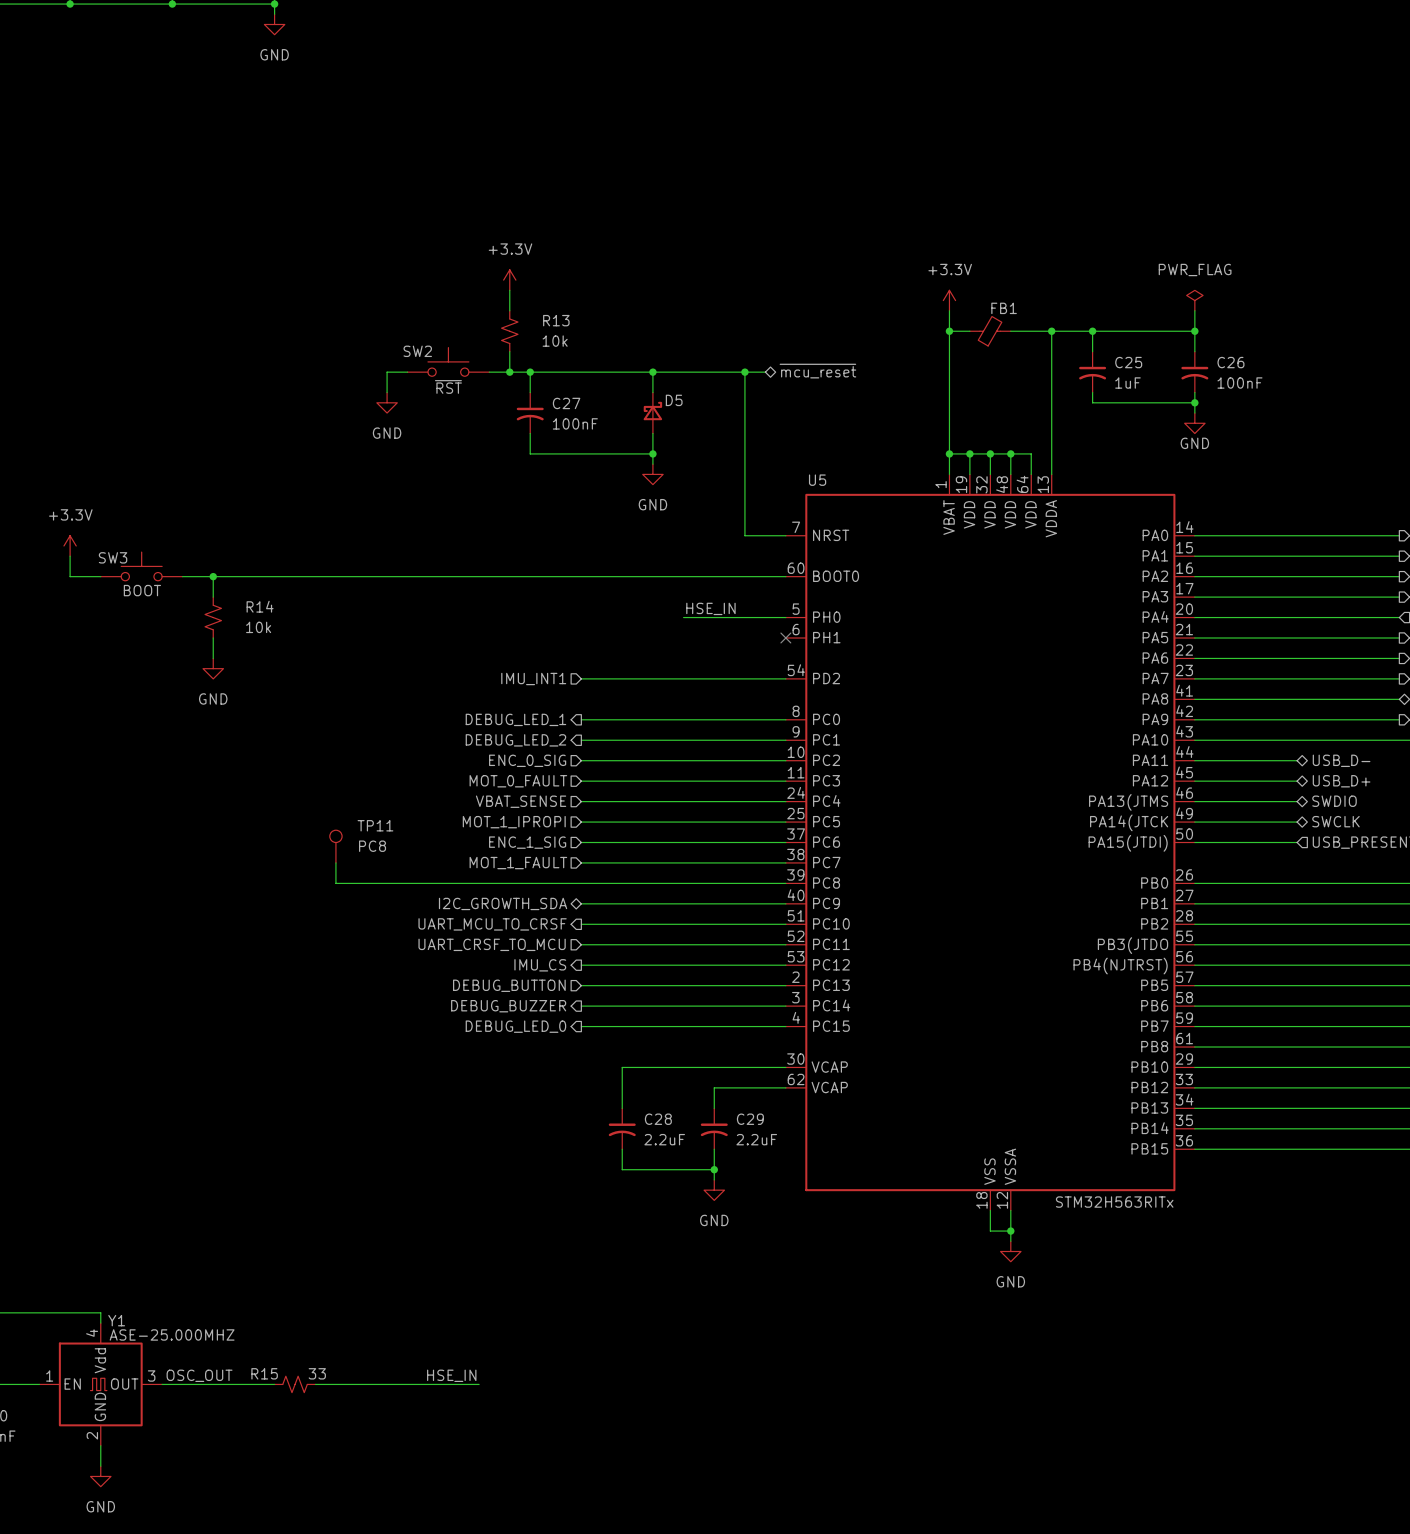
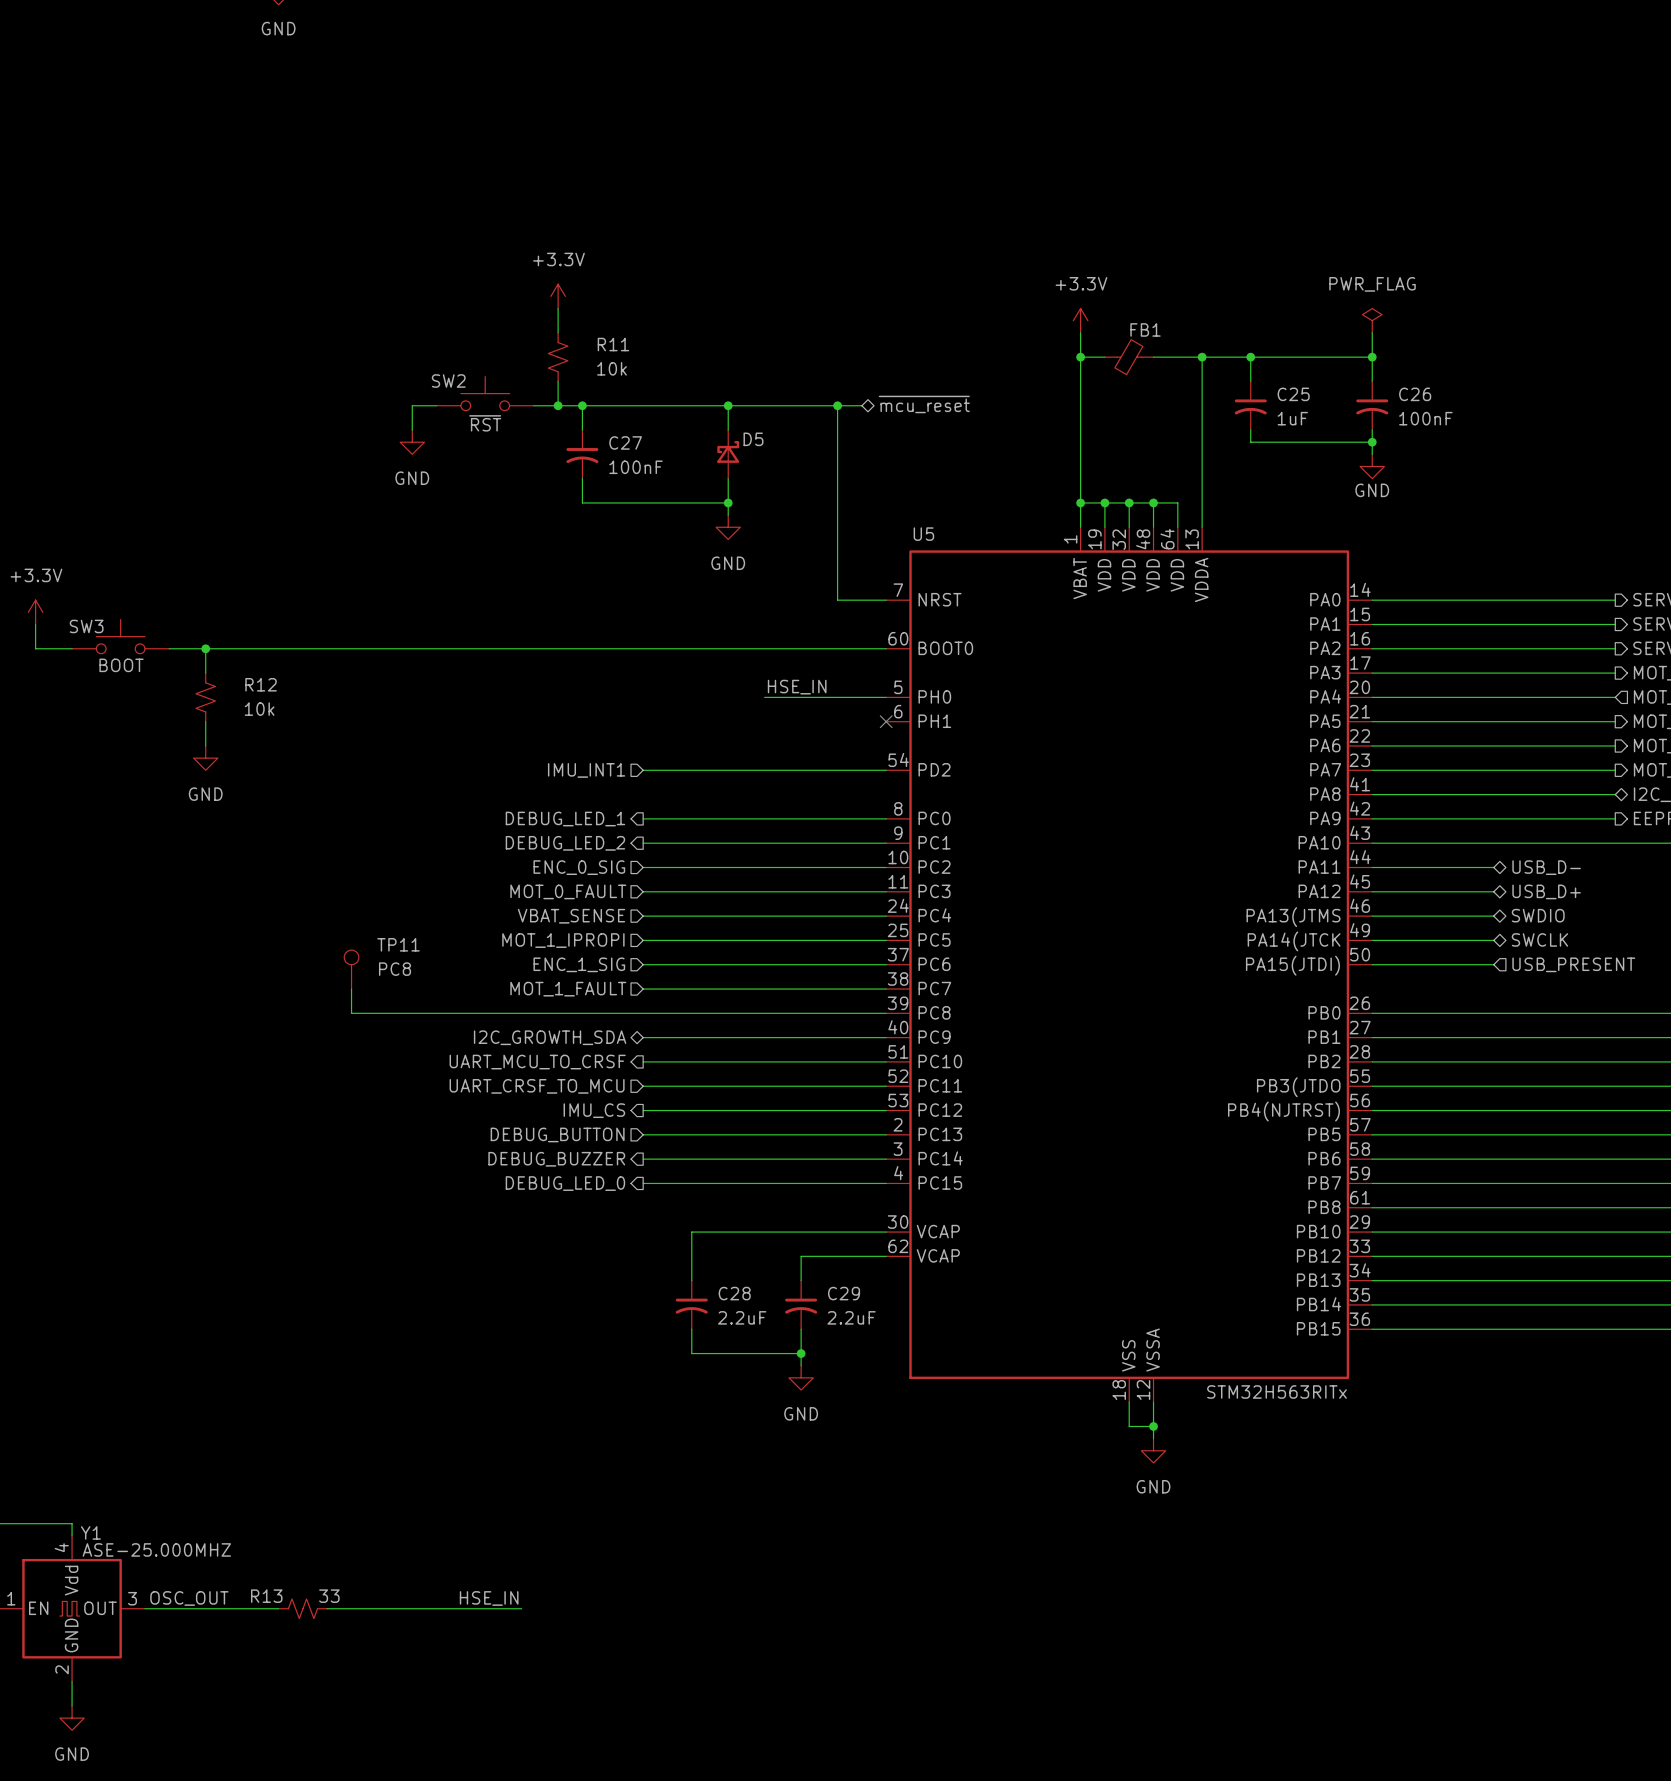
R13 name: R13 (556, 320) -> R11 (613, 344)
R14 name: R14 (260, 606) -> R12 (261, 684)
R15 name: R15 (264, 1373) -> R13 (266, 1596)

